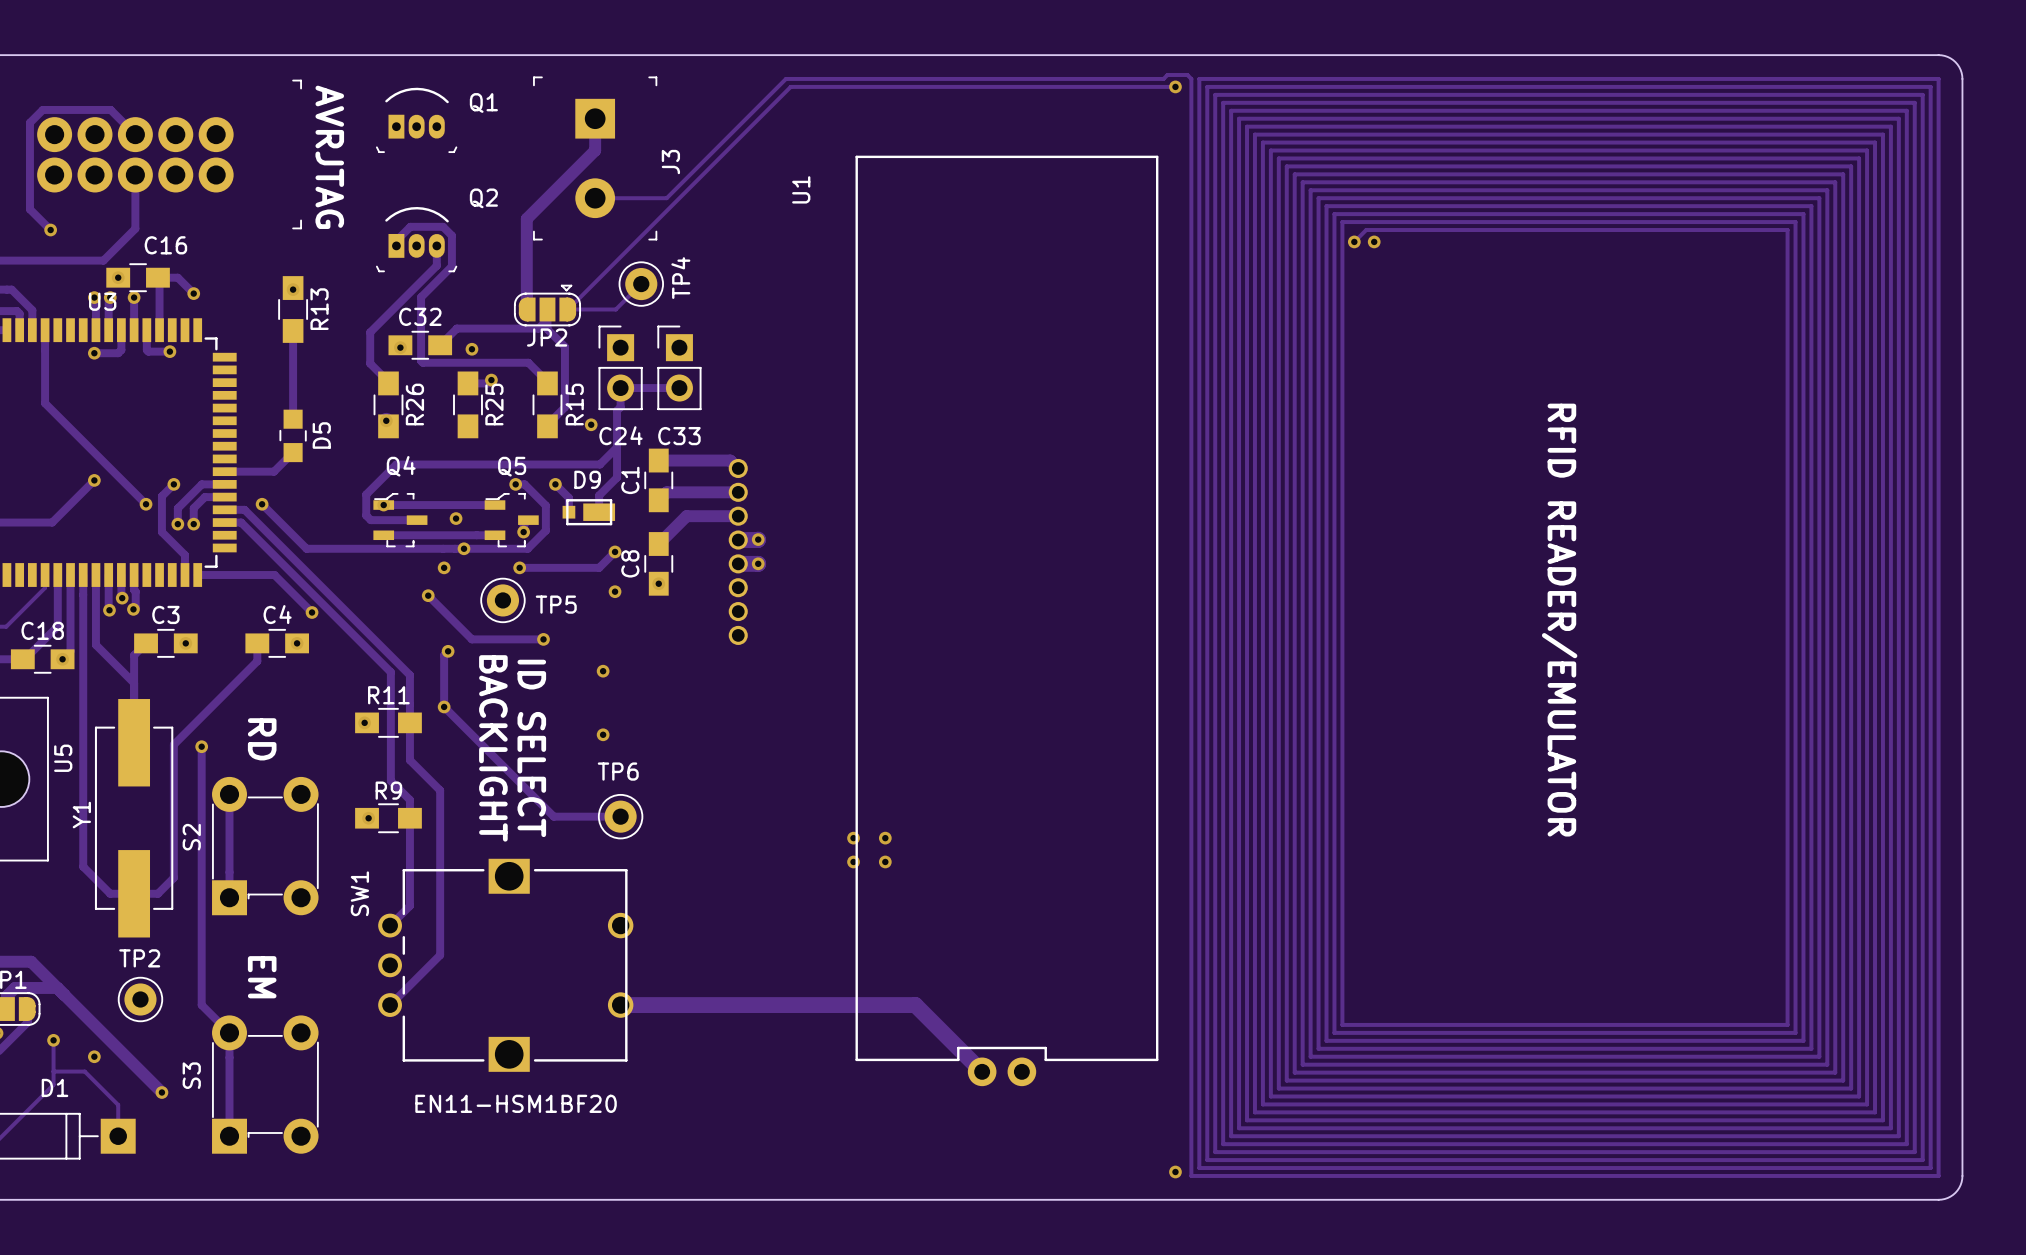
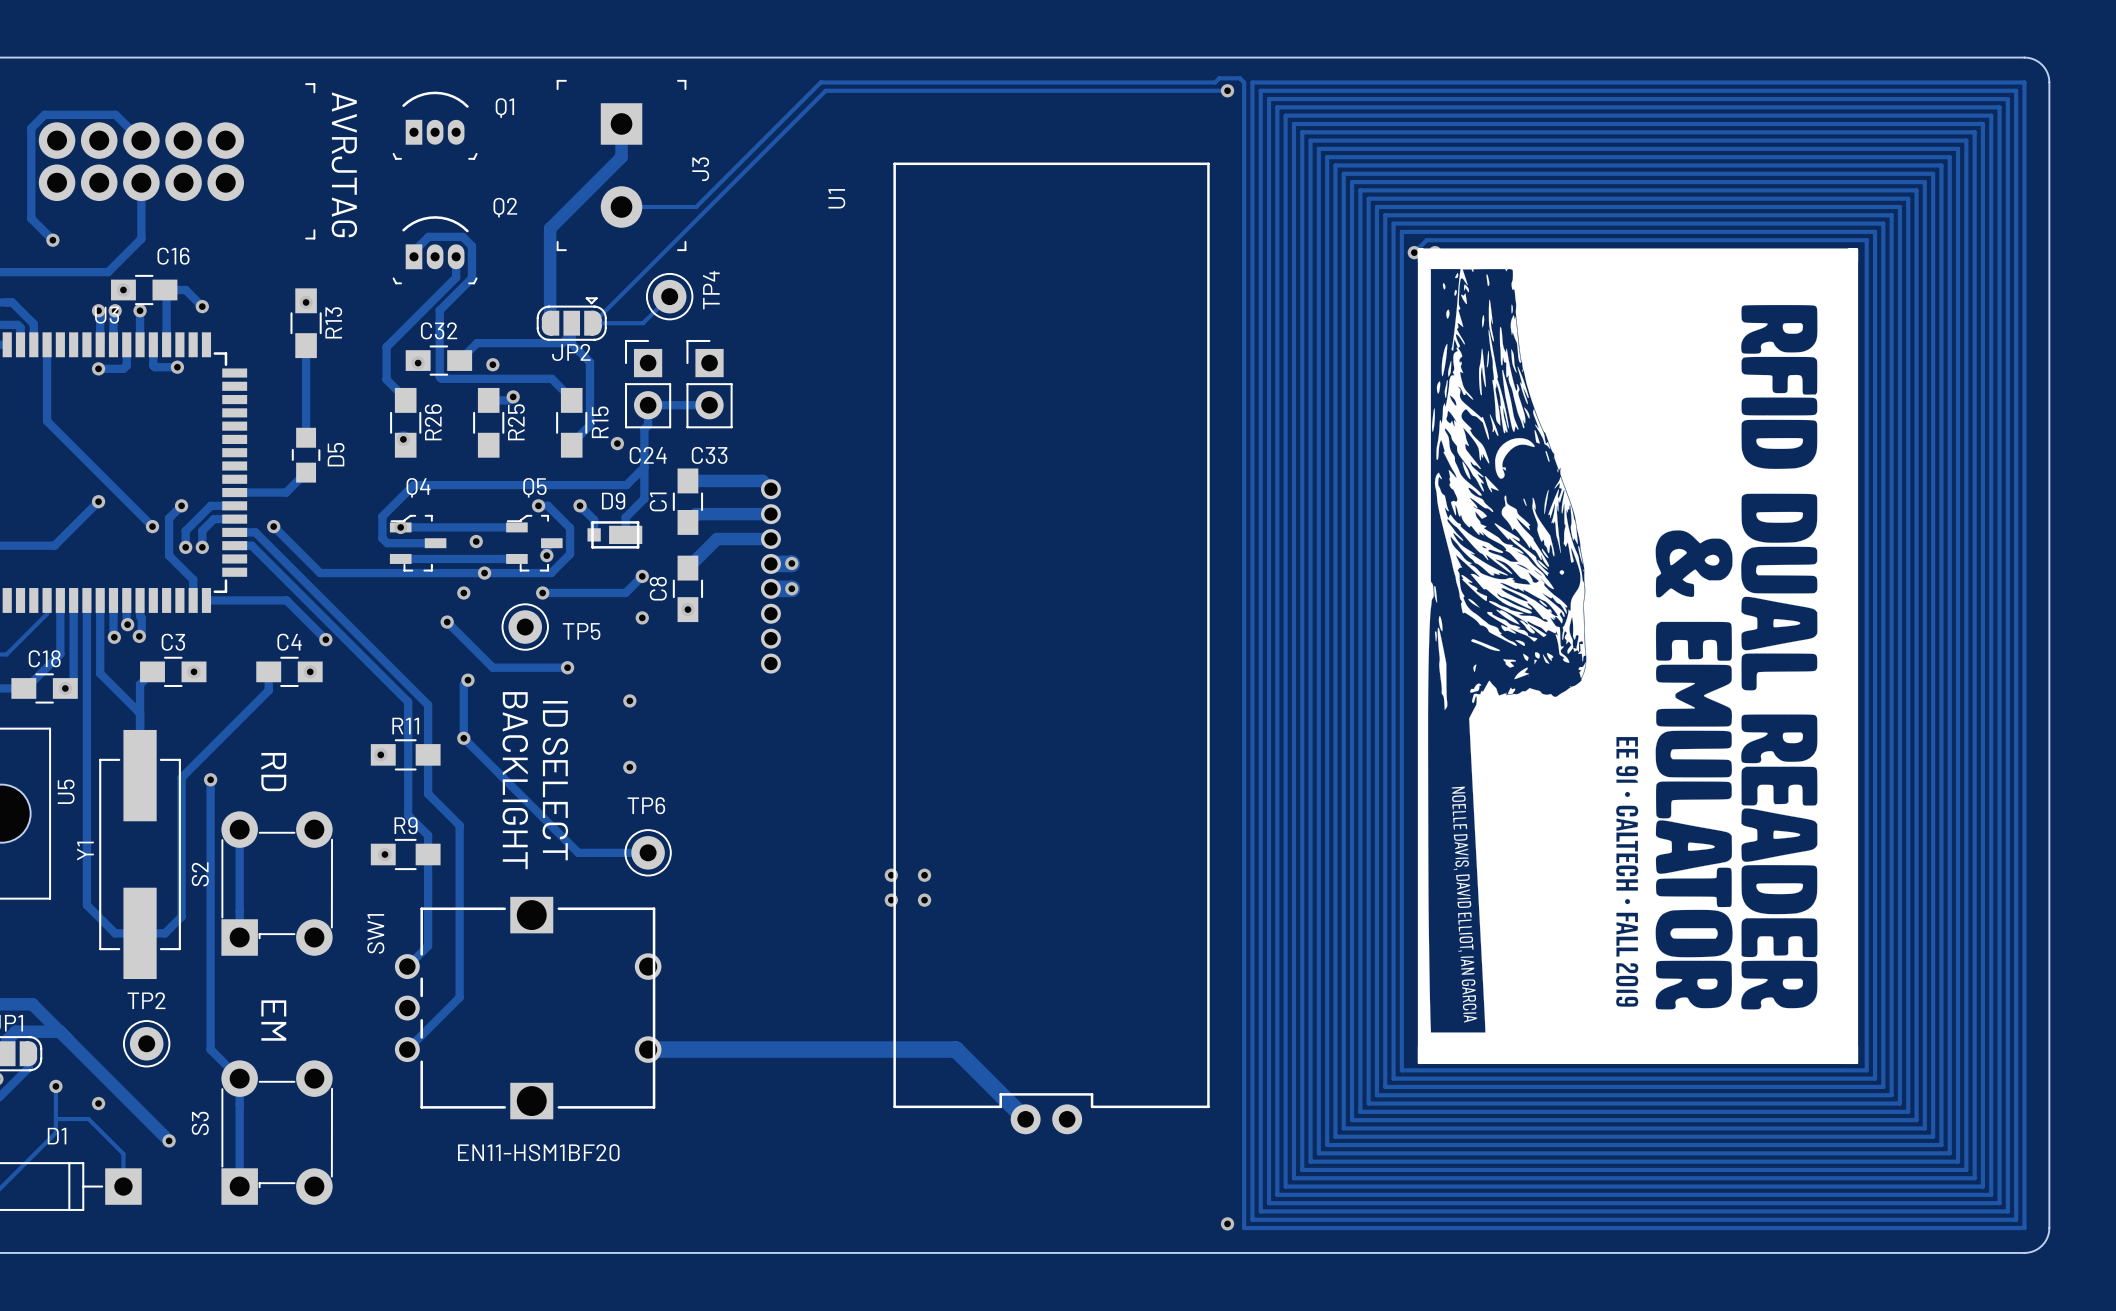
drawing: none -> [1417, 248, 1859, 1065]
text: RFID READER/EMULATOR (1559, 620) -> none

